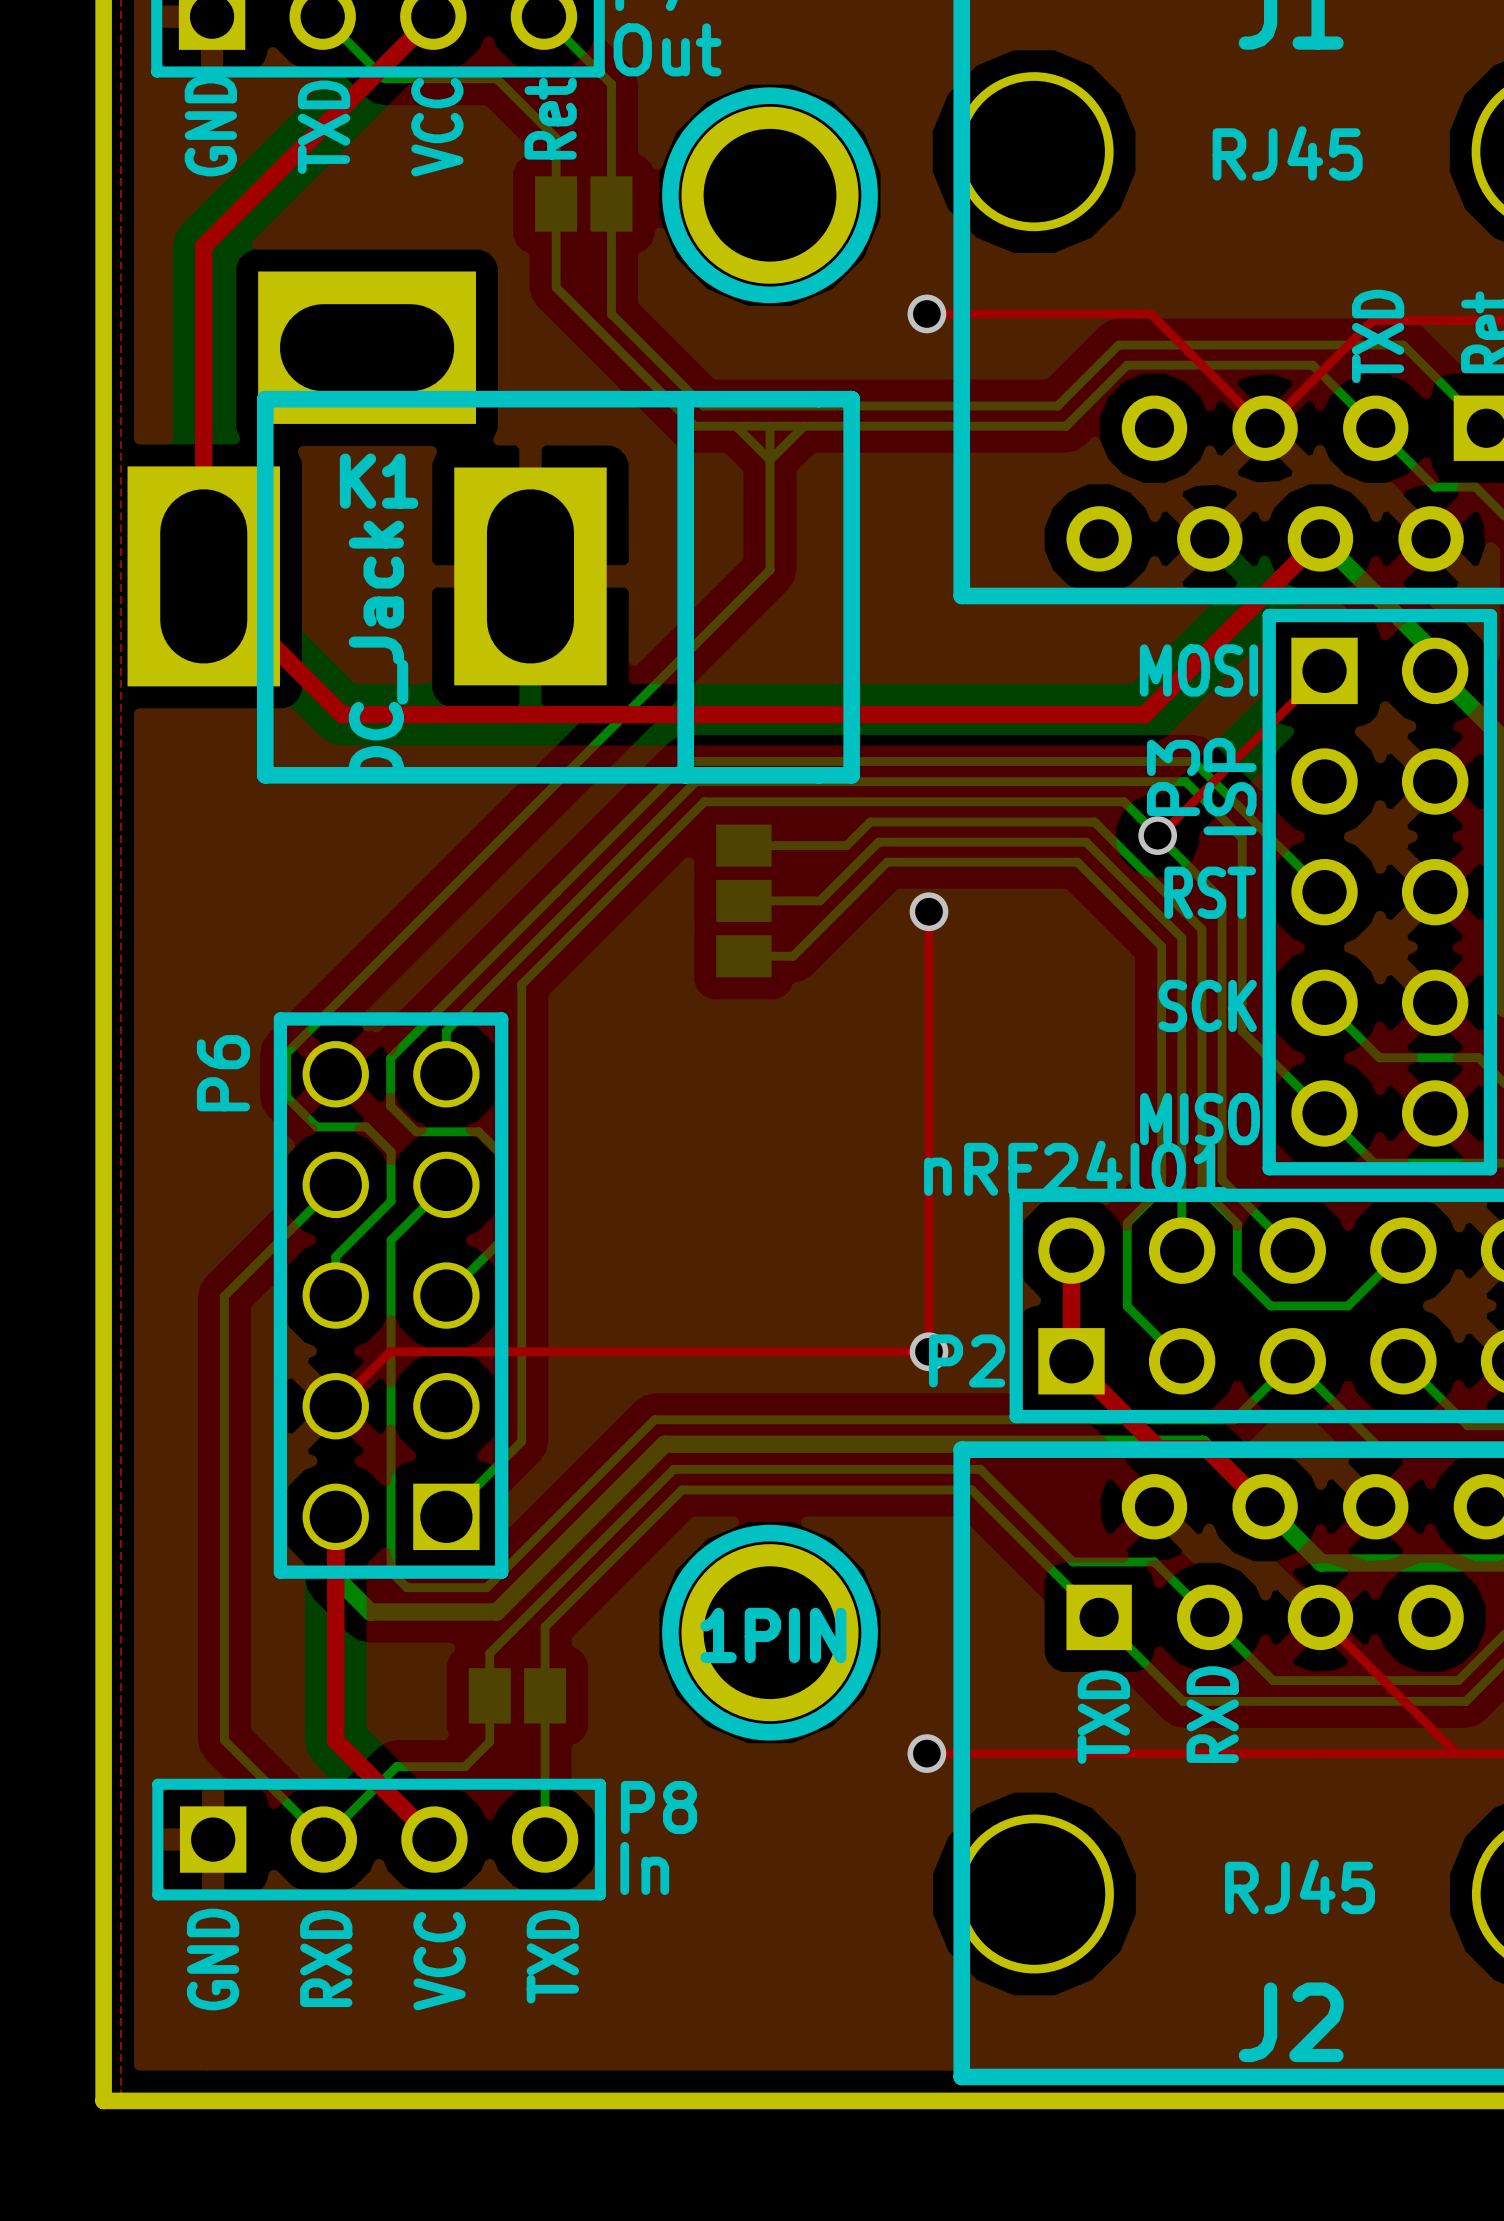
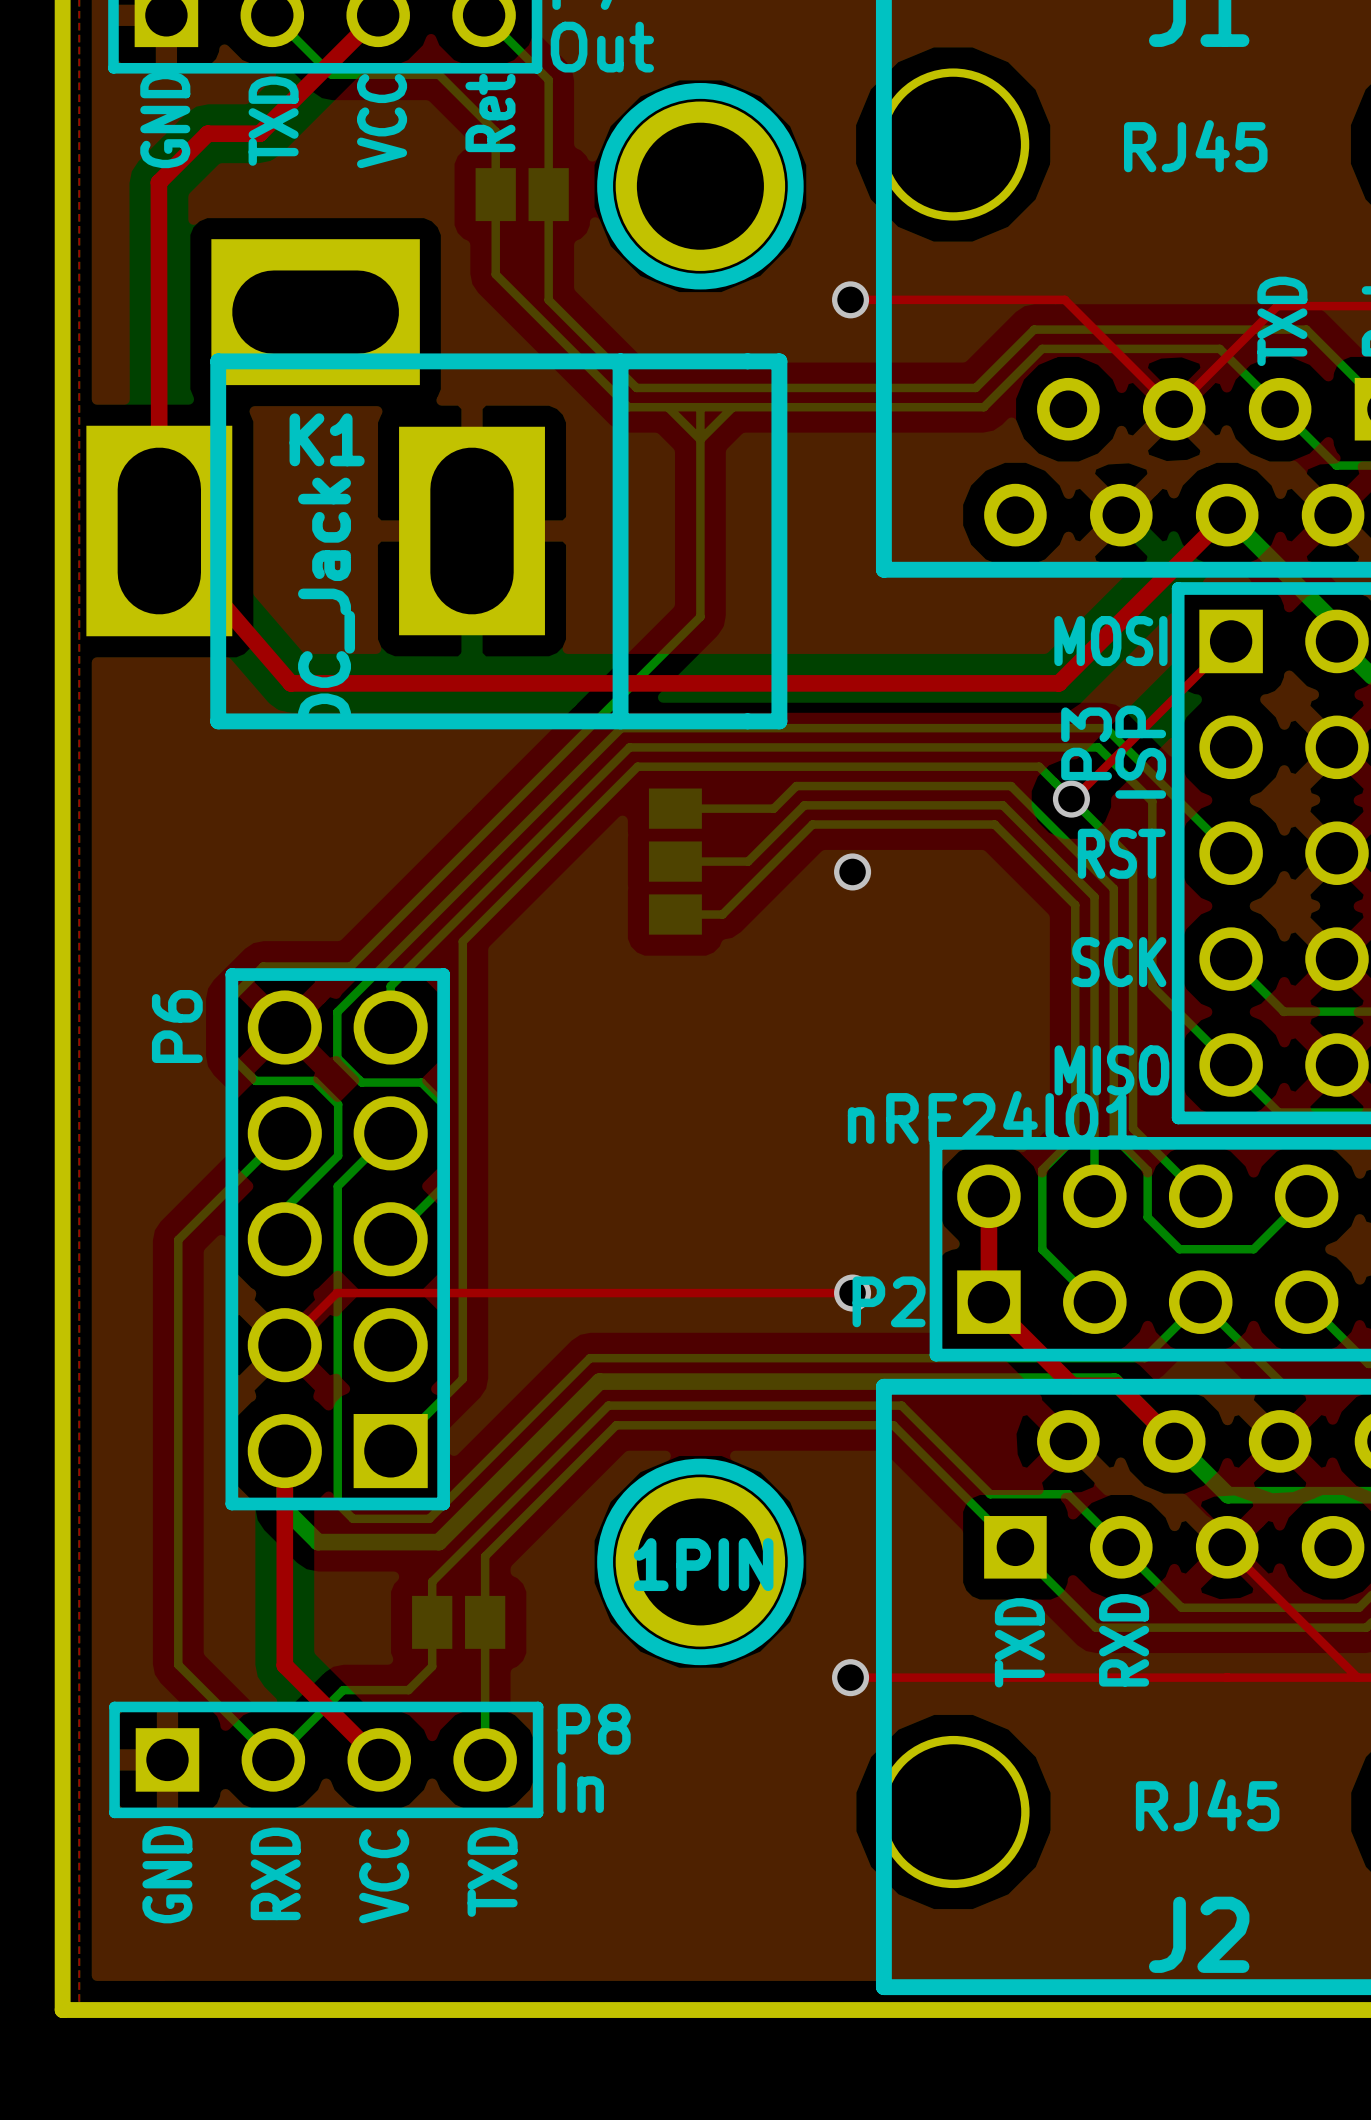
top track: (309, 140) (203, 246) (203, 576) (342, 714) -> (259, 133) (207, 133) (158, 182) (159, 531) (290, 683)
K1 position: (493, 527) -> (436, 484)
bottom track: (770, 569) (286, 1053) (286, 1096) (316, 1126) (366, 1126) (391, 1151) (391, 1201) (335, 1256) (335, 1264) -> (700, 544) (700, 616) (350, 966) (263, 966) (231, 998) (231, 1056) (255, 1080) (314, 1080) (338, 1104) (338, 1155) (284, 1209)
top track: (928, 911) (928, 1358) -> none
P6 footprint: [273, 1012, 509, 1579] -> [225, 968, 450, 1511]

